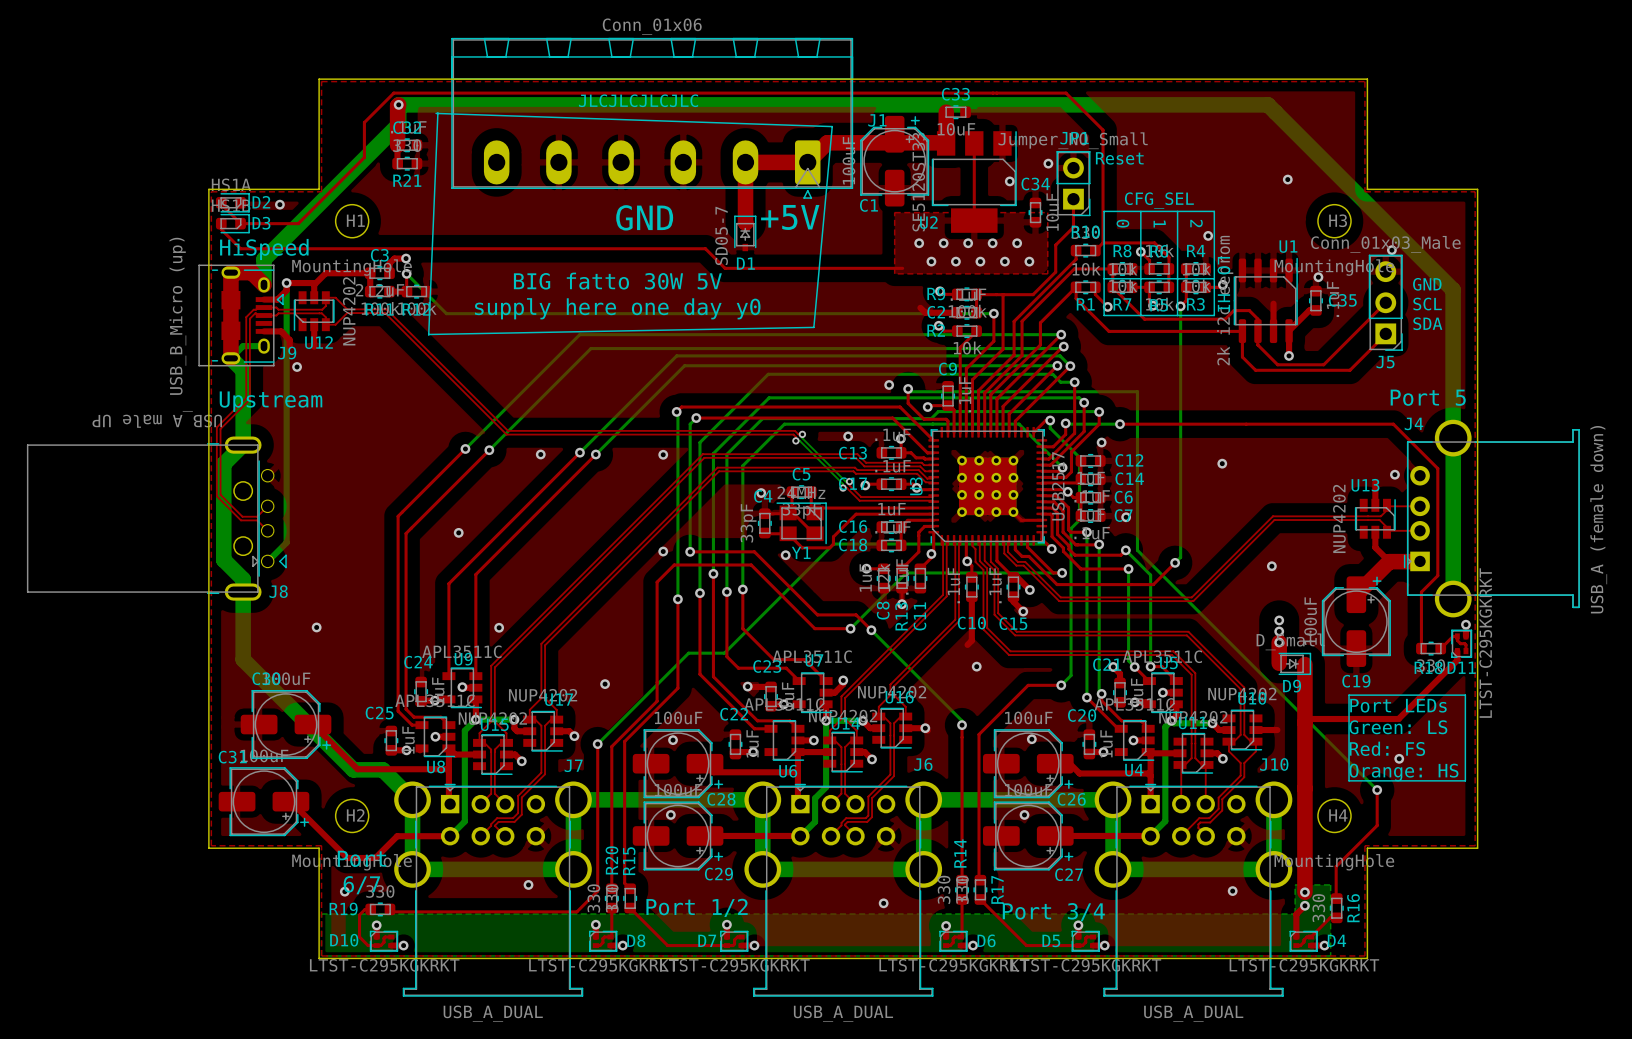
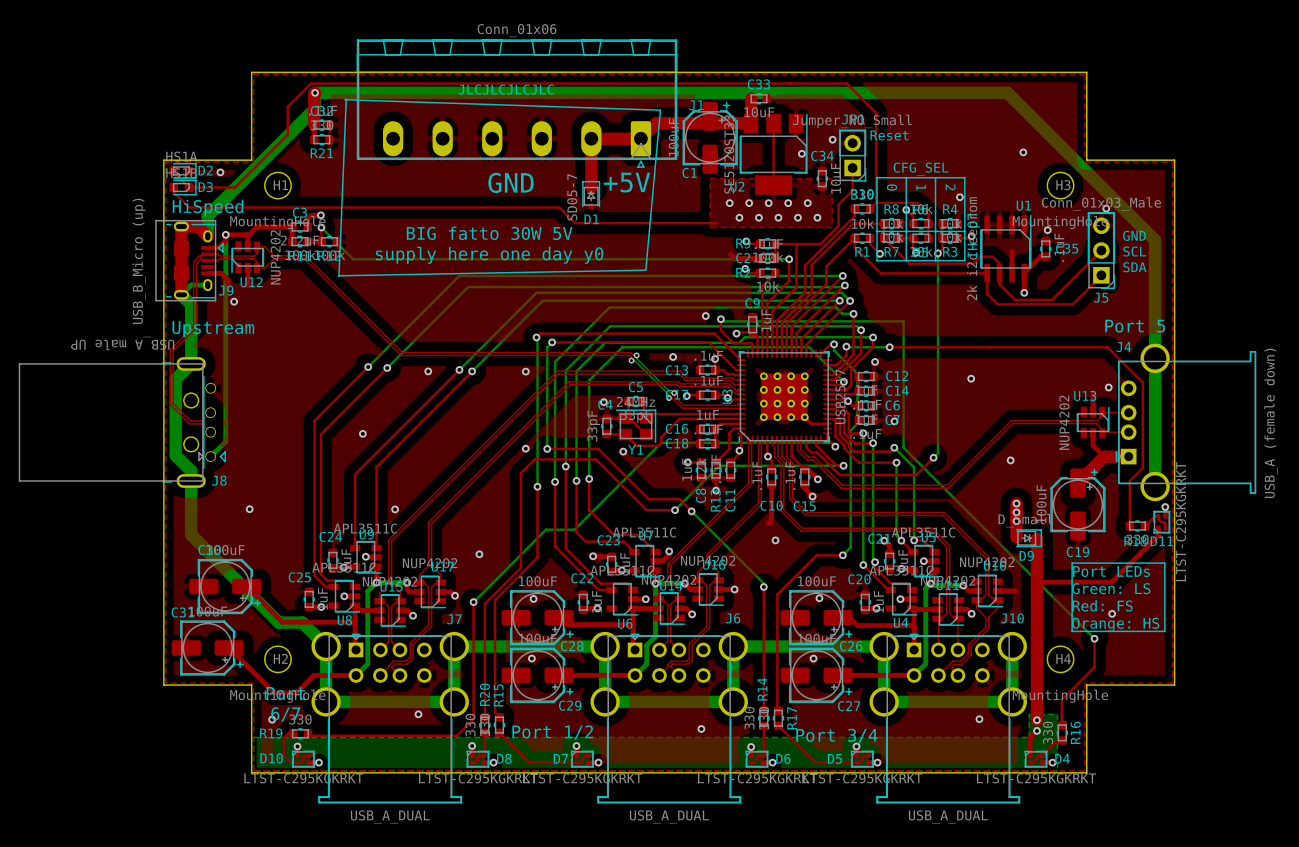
top track: none -> (1016, 503) (1016, 521)

